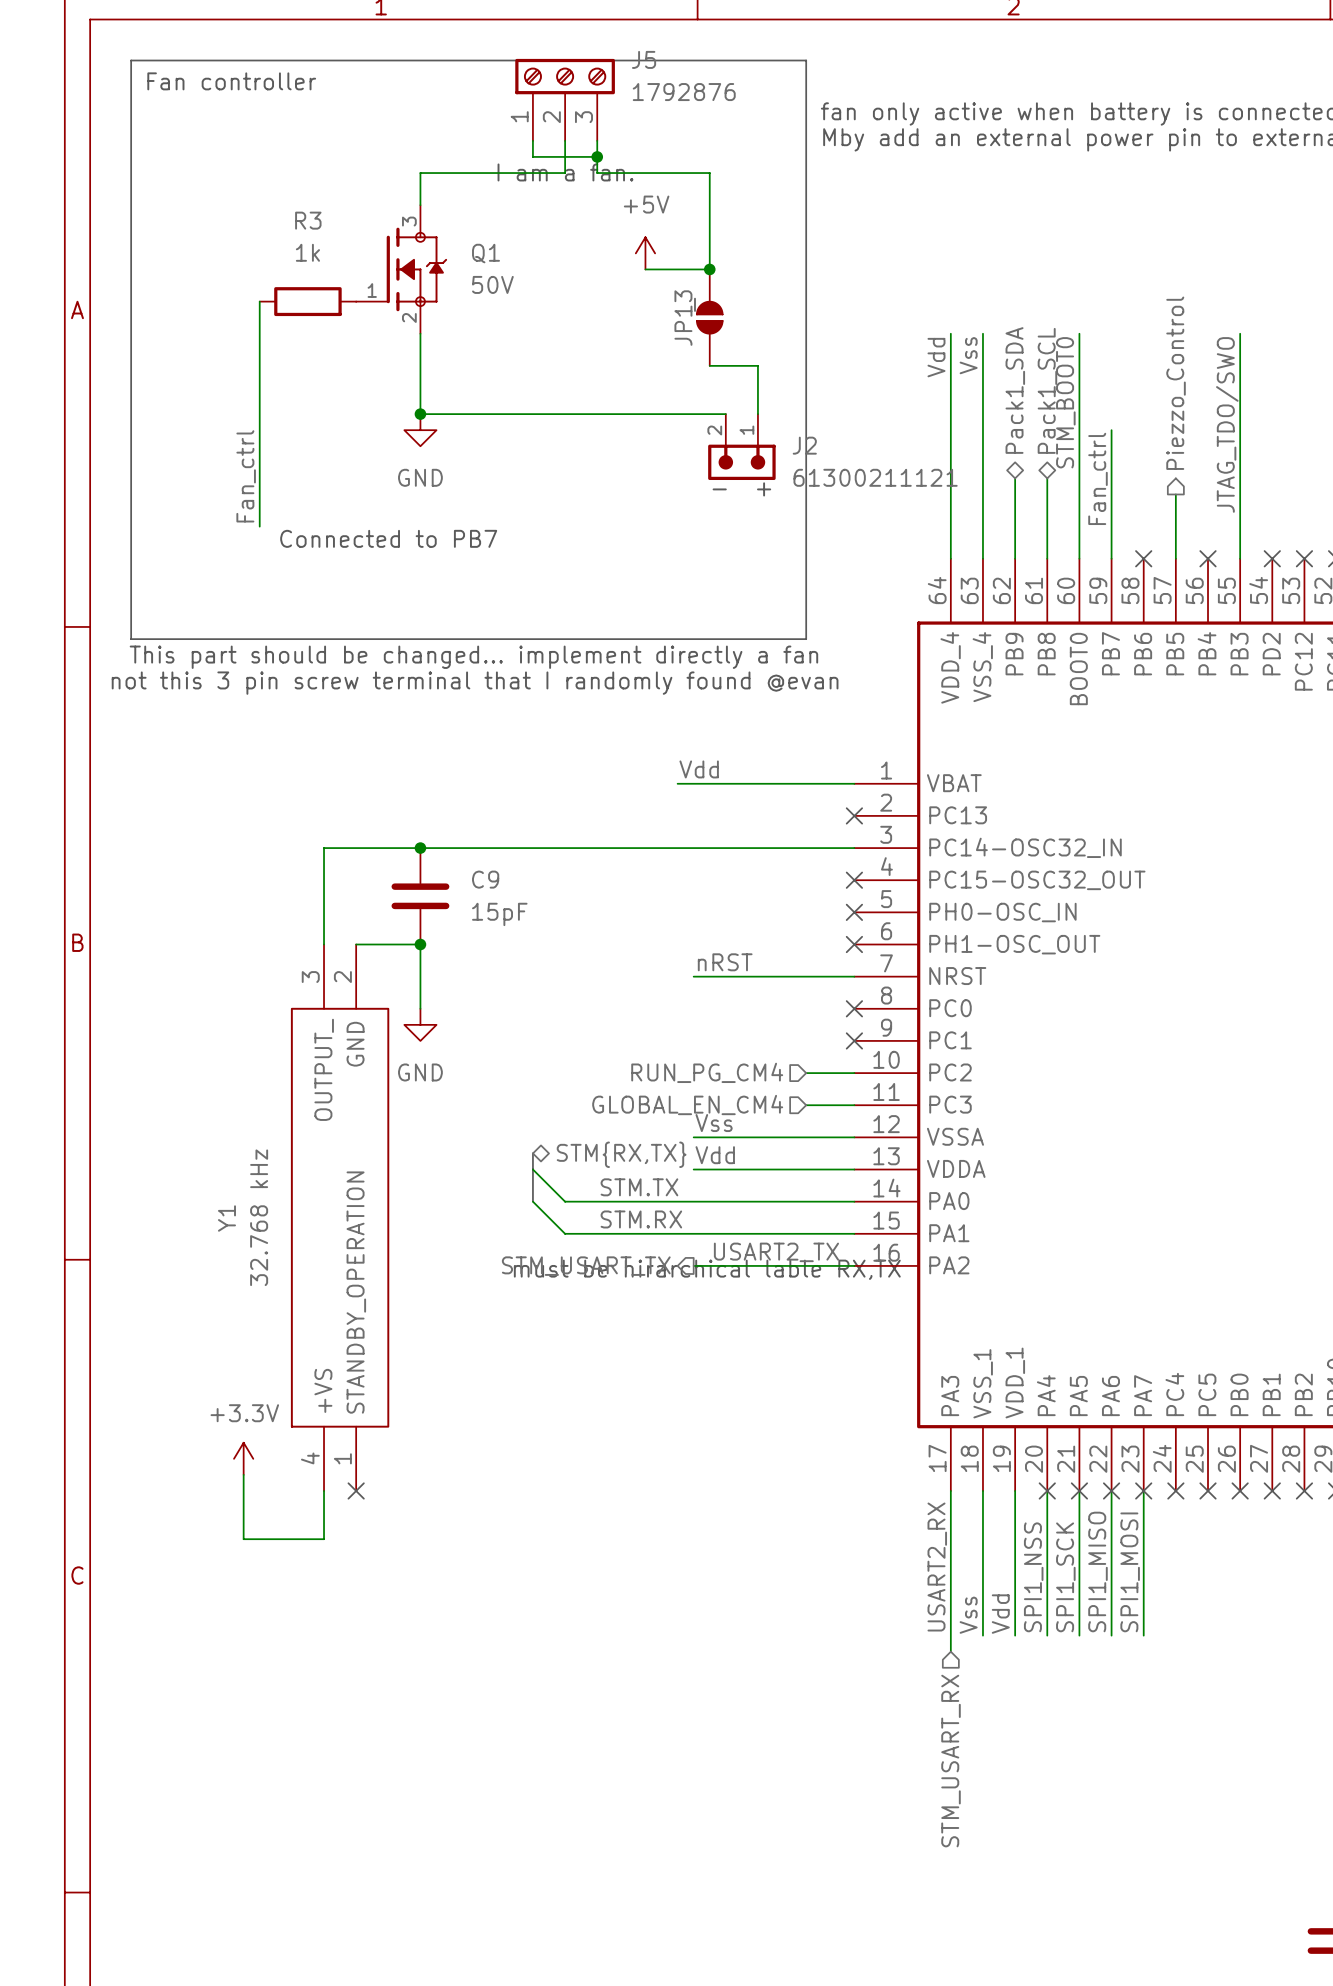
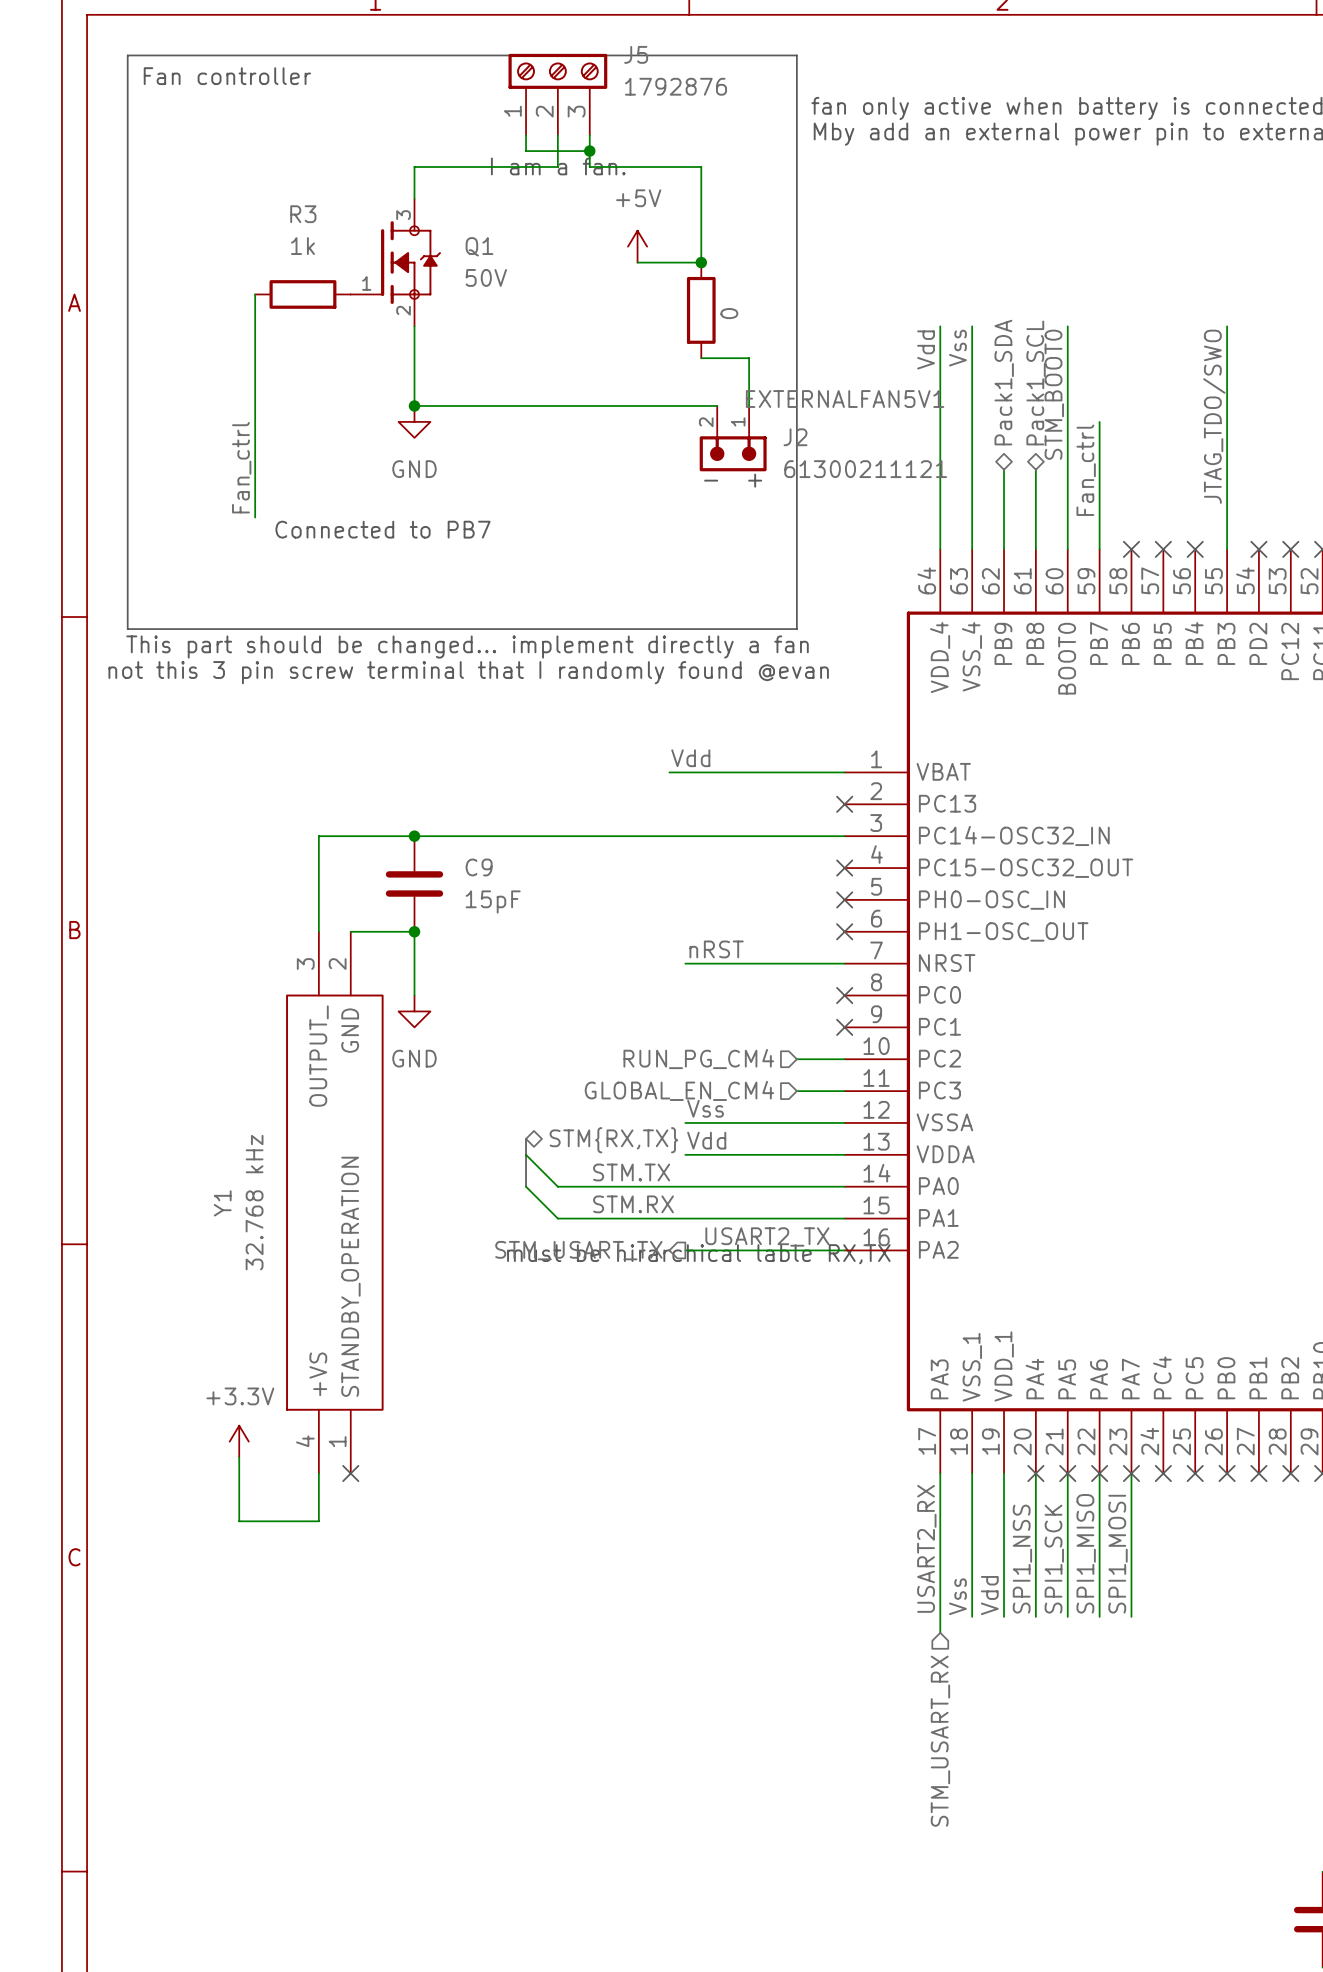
JP13: - (709, 317) -> none
EXTERNALFAN5V1: none -> 0 (701, 310)
hierarchical label: Piezzo_Control (1176, 383) -> none
wire: (1175, 494) (1175, 558) -> none
no-connect mark: none -> (1163, 549)

